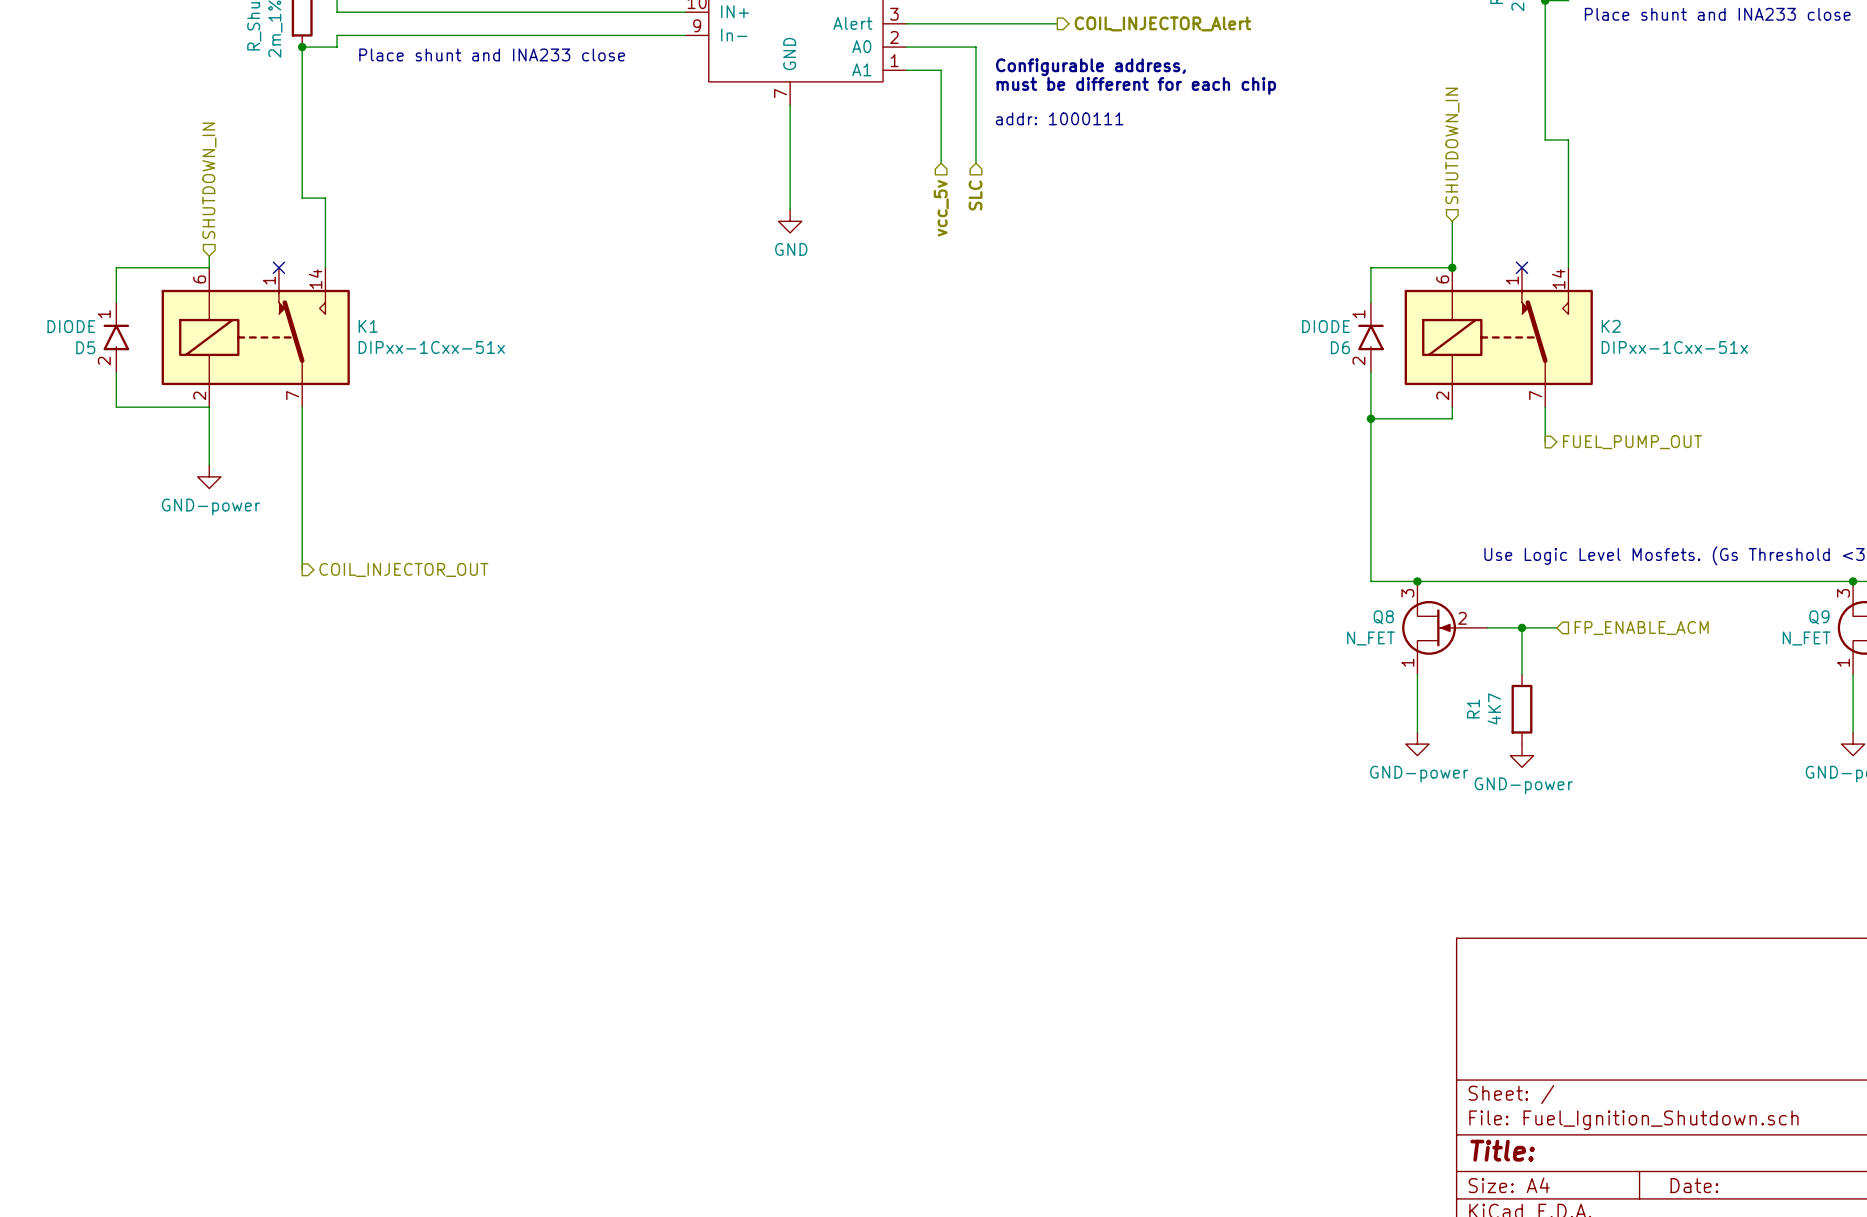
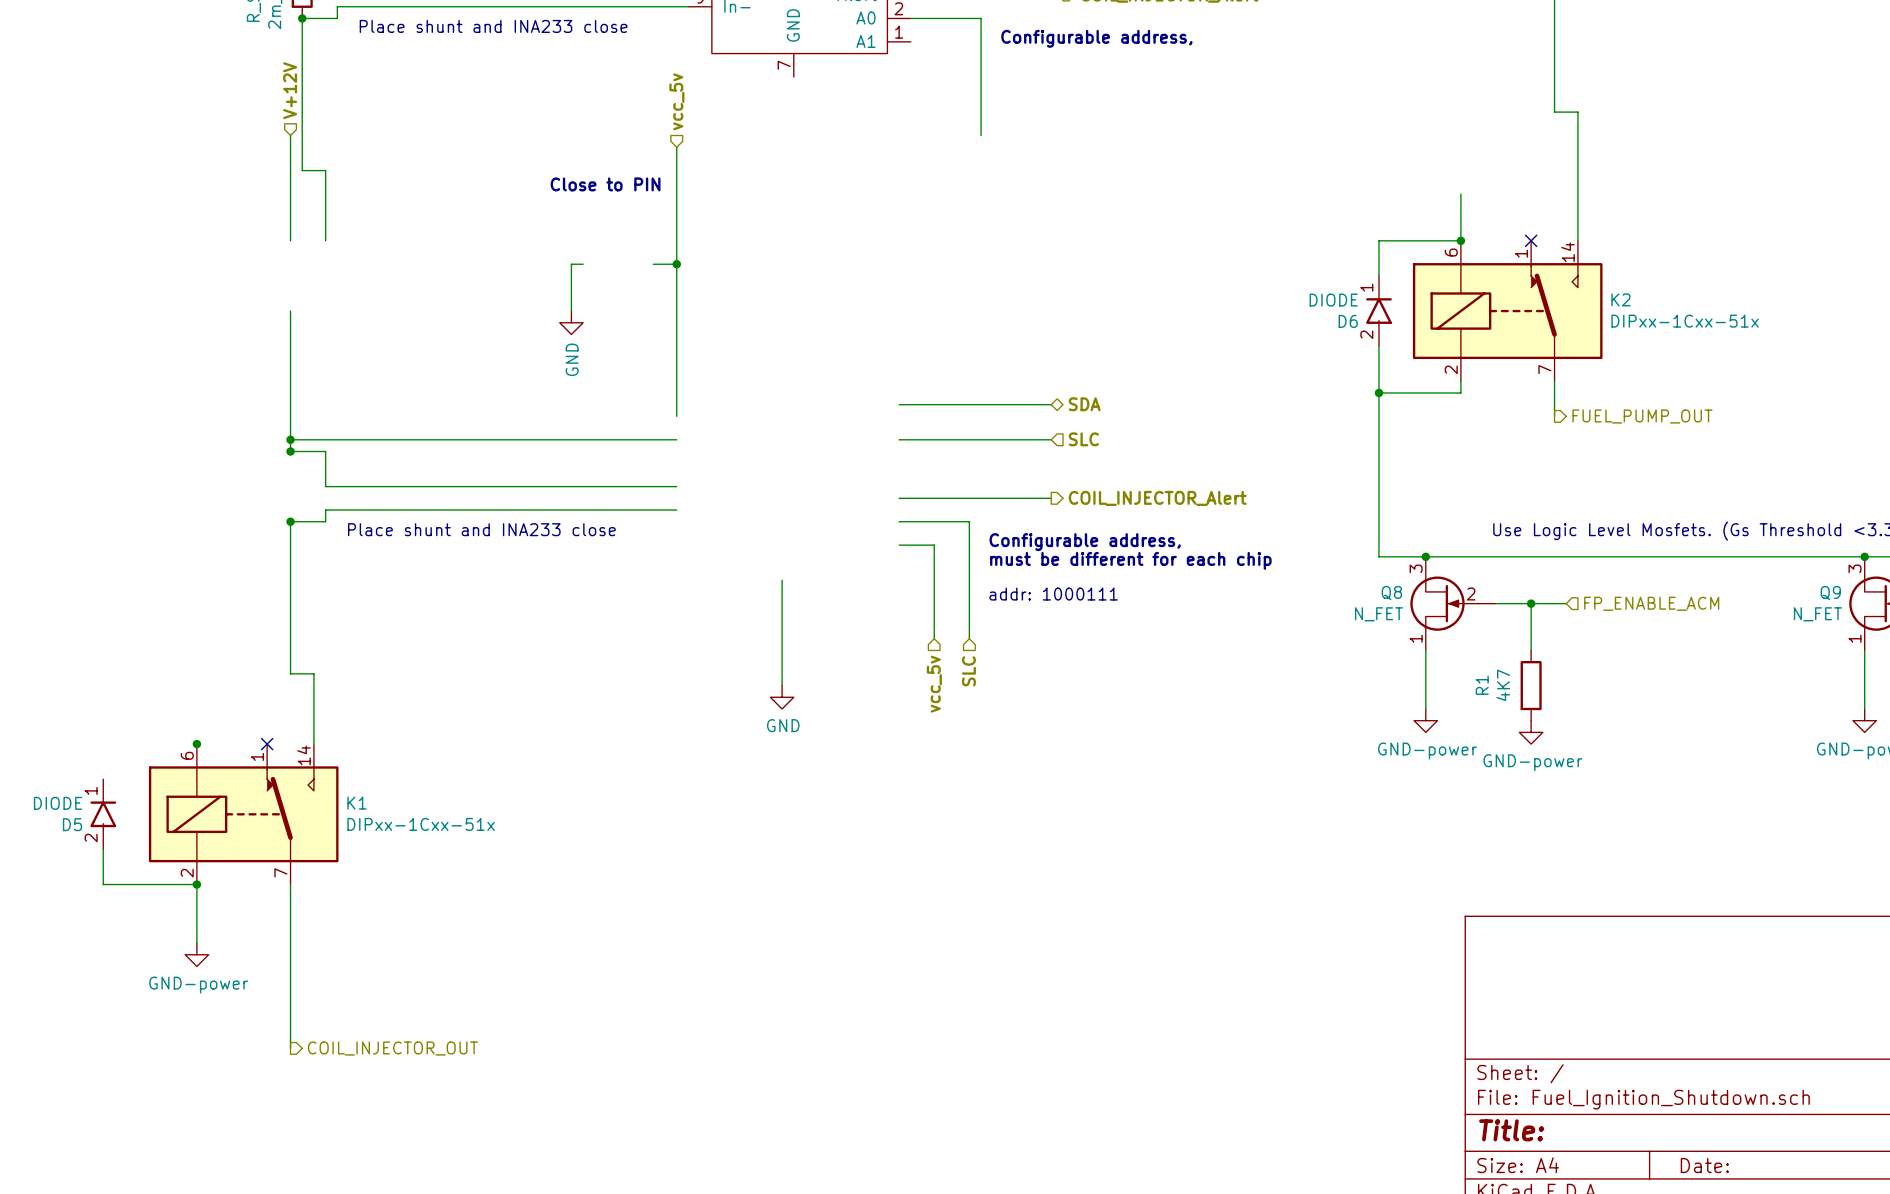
wire: (906, 70) (941, 70) (941, 163) -> none
text: must be different for each chip (1136, 85) -> none
wire: (790, 105) (790, 209) -> none
hierarchical label: none -> V+12V (290, 90)
text: addr: 1000111 (1059, 118) -> none
hierarchical label: none -> vcc_5v (676, 101)
hierarchical label: SHUTDOWN_IN (1452, 145) -> none
wire: none -> (290, 135) (290, 240)
wire: none -> (676, 147) (676, 416)
hierarchical label: SHUTDOWN_IN (209, 180) -> none
hierarchical label: SLC (975, 195) -> none
hierarchical label: vcc_5v (941, 208) -> none
text: none -> Close to PIN (605, 184)
power symbol: GND (790, 221) -> none
wire: (209, 256) (209, 267) (116, 267) (116, 302) -> none
no-connect mark: (278, 267) -> none
wire: none -> (583, 264) (571, 264) (571, 311)
wire: none -> (653, 264) (676, 264)
junction: none -> (676, 264)
D5 position: (116, 337) -> (103, 814)
K1 position: (255, 337) -> (243, 814)
wire: none -> (290, 311) (290, 451) (325, 451) (325, 486) (676, 486)
power symbol: none -> GND (571, 322)
wire: (116, 372) (116, 407) (209, 407) (209, 465) -> none
wire: (302, 407) (302, 569) -> none
hierarchical label: none -> SDA (1084, 404)
wire: none -> (899, 404) (1051, 404)
hierarchical label: none -> SLC (1083, 439)
wire: none -> (290, 439) (676, 439)
junction: none -> (290, 439)
wire: none -> (899, 439) (1051, 439)
power symbol: GND-power (209, 476) -> none
junction: none -> (290, 451)
wire: none -> (899, 498) (1051, 498)
hierarchical label: none -> COIL_INJECTOR_Alert (1157, 498)
wire: none -> (676, 510) (325, 510) (325, 521) (290, 521) (290, 673) (313, 673) (313, 744)
junction: none -> (290, 521)
wire: none -> (899, 521) (969, 521) (969, 638)
text: none -> Place shunt and INA233 close (481, 529)
text: none -> Configurable address, (1085, 542)
hierarchical label: COIL_INJECTOR_OUT (403, 569) -> none
wire: none -> (899, 545) (934, 545) (934, 638)
text: none -> must be different for each chip (1130, 560)
wire: none -> (782, 580) (782, 685)
text: none -> addr: 1000111 (1053, 594)
hierarchical label: none -> SLC (968, 671)
hierarchical label: none -> vcc_5v (934, 684)
power symbol: none -> GND (782, 697)
junction: none -> (196, 744)
no-connect mark: none -> (267, 744)
wire: none -> (103, 849) (103, 884) (196, 884) (196, 943)
junction: none -> (196, 884)
wire: none -> (290, 884) (290, 1048)
power symbol: none -> GND-power (196, 954)
hierarchical label: none -> COIL_INJECTOR_OUT (392, 1048)

